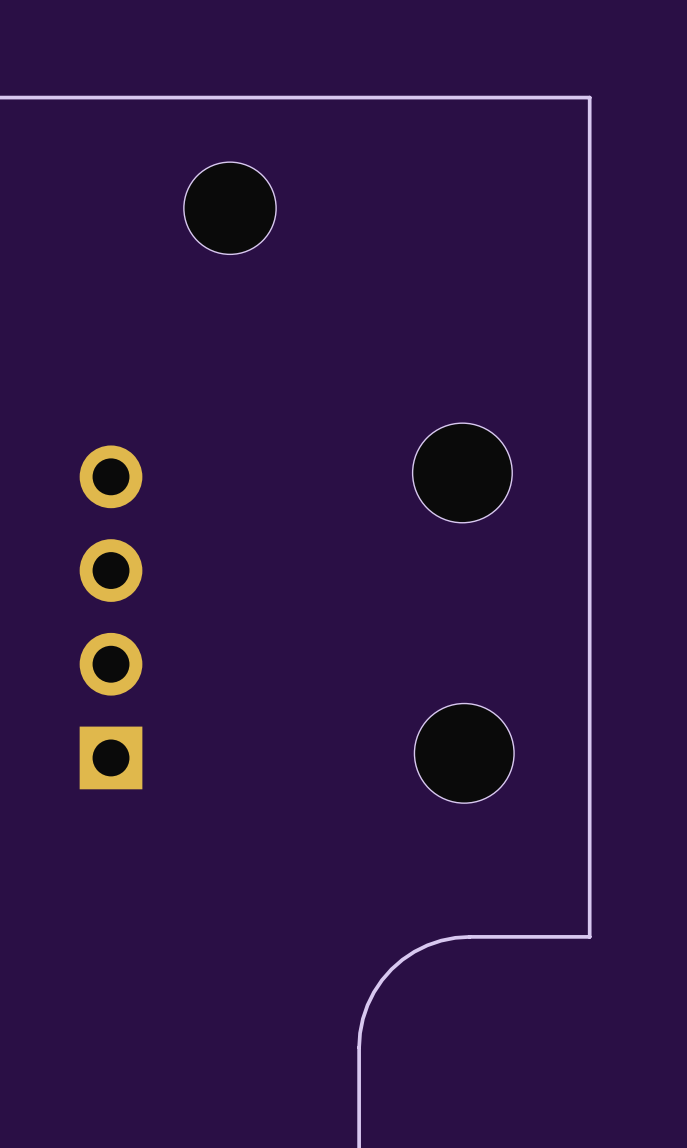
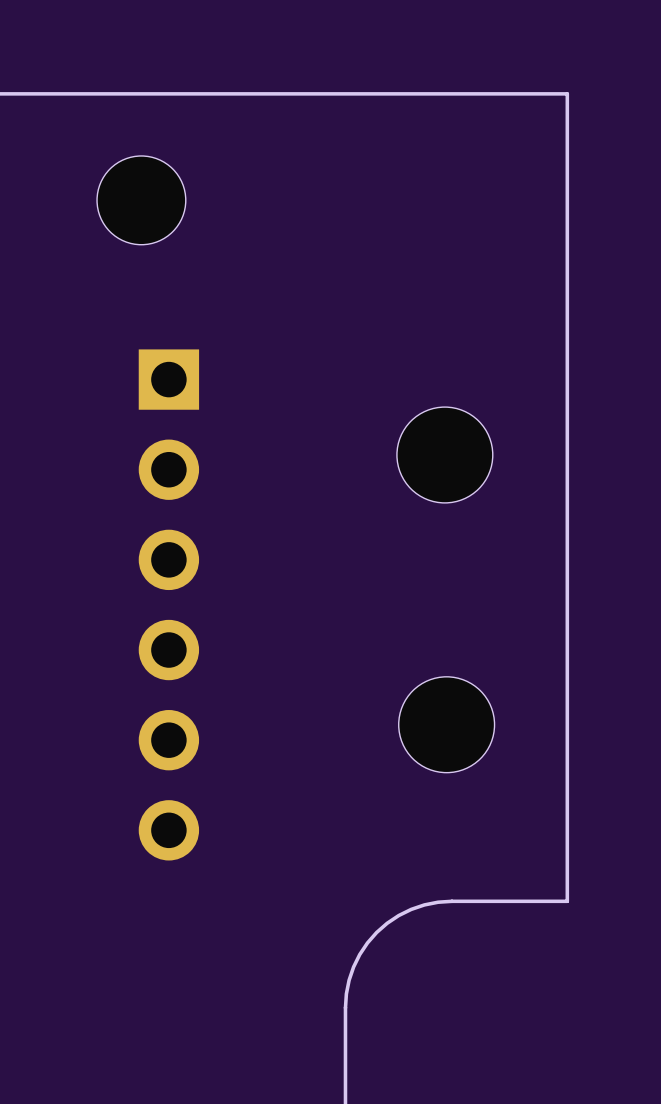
part position: (229, 208) -> (141, 200)
part: (111, 617) -> none
part: none -> (168, 604)

